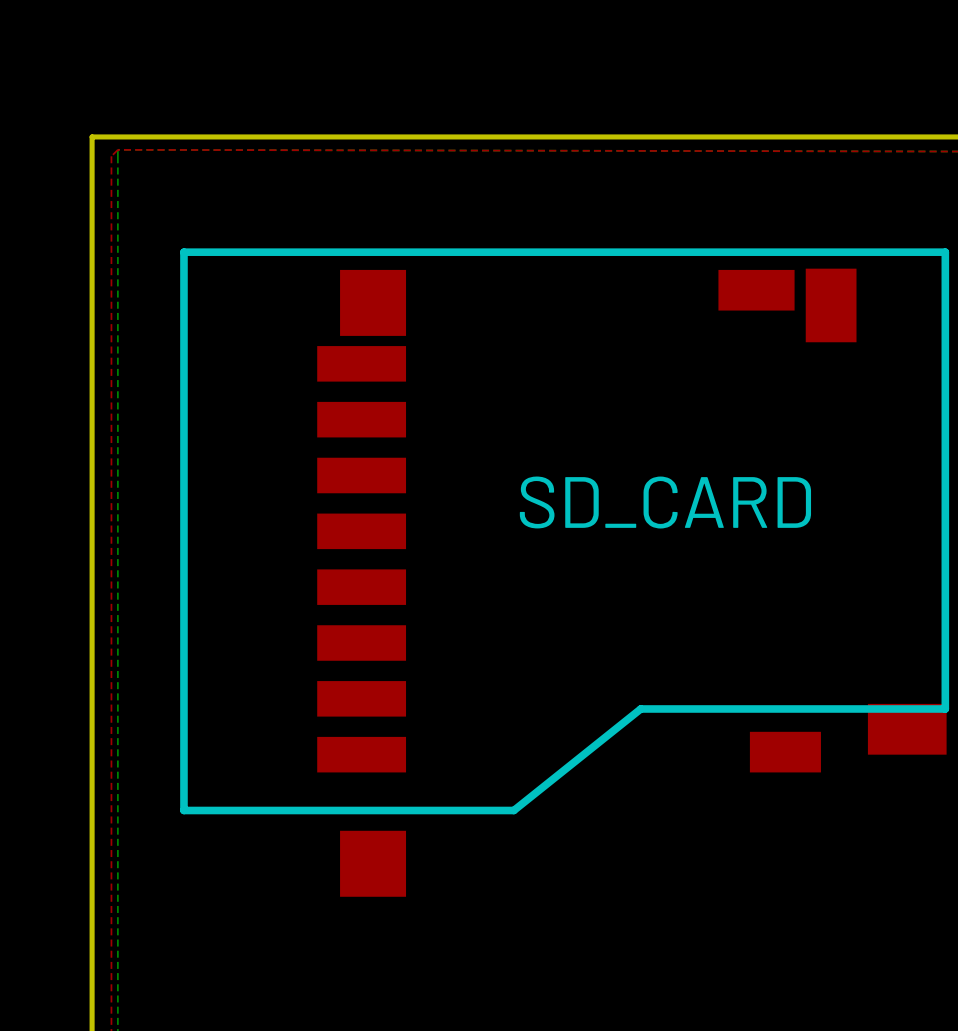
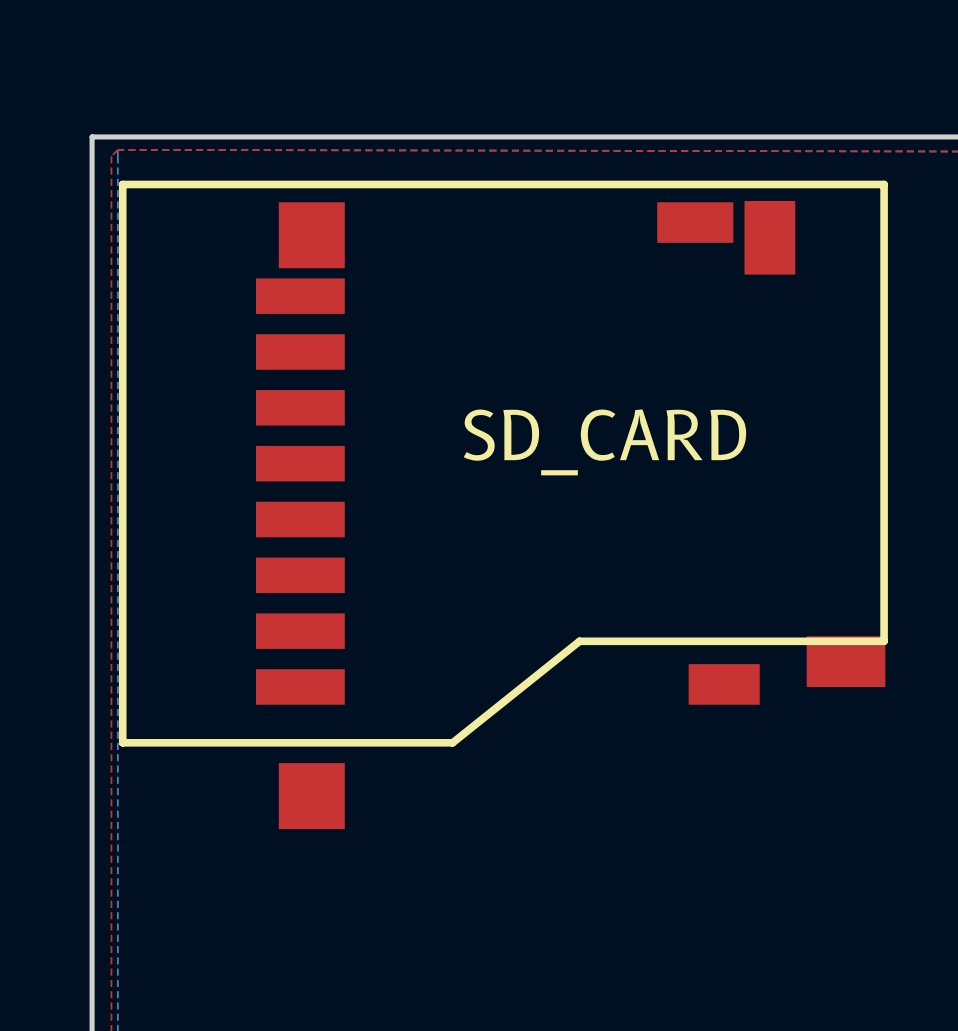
part position: (564, 572) -> (503, 504)

